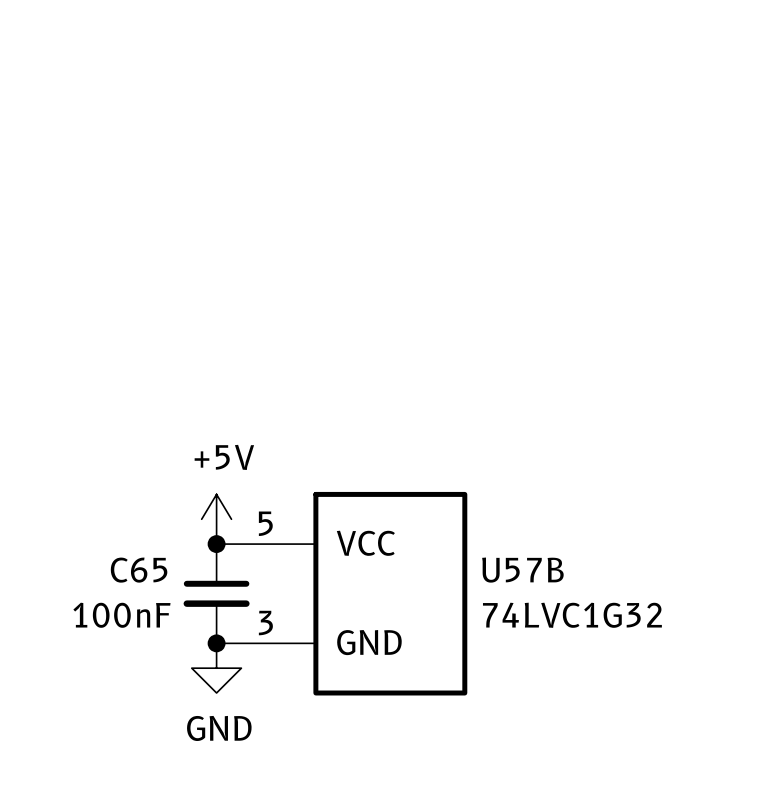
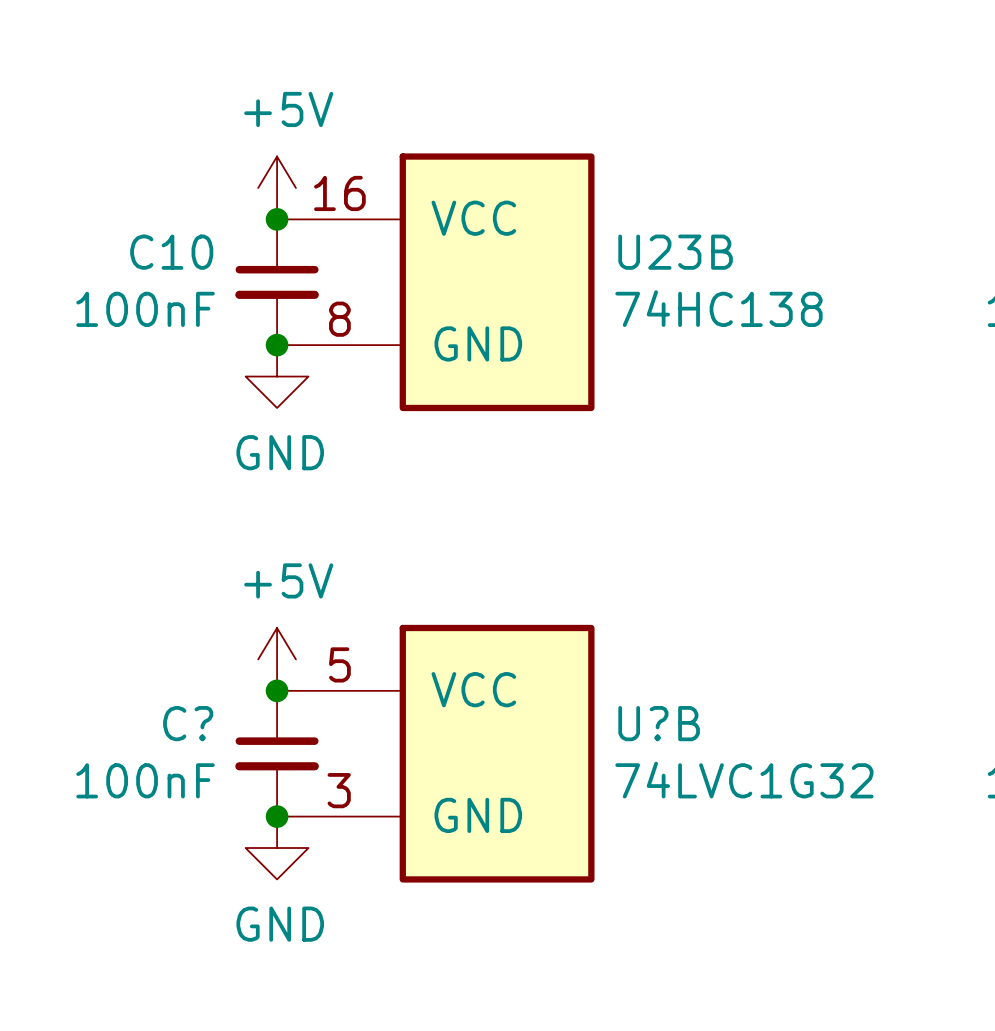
power symbol: none -> +5V (277, 187)
junction: none -> (277, 219)
C10: none -> 100nF (277, 282)
U23B: none -> 74HC138 (435, 282)
junction: none -> (277, 345)
power symbol: none -> GND (277, 376)
C65 name: C65 (139, 570) -> C? (188, 723)
U57B name: U57B (522, 570) -> U?B (659, 723)

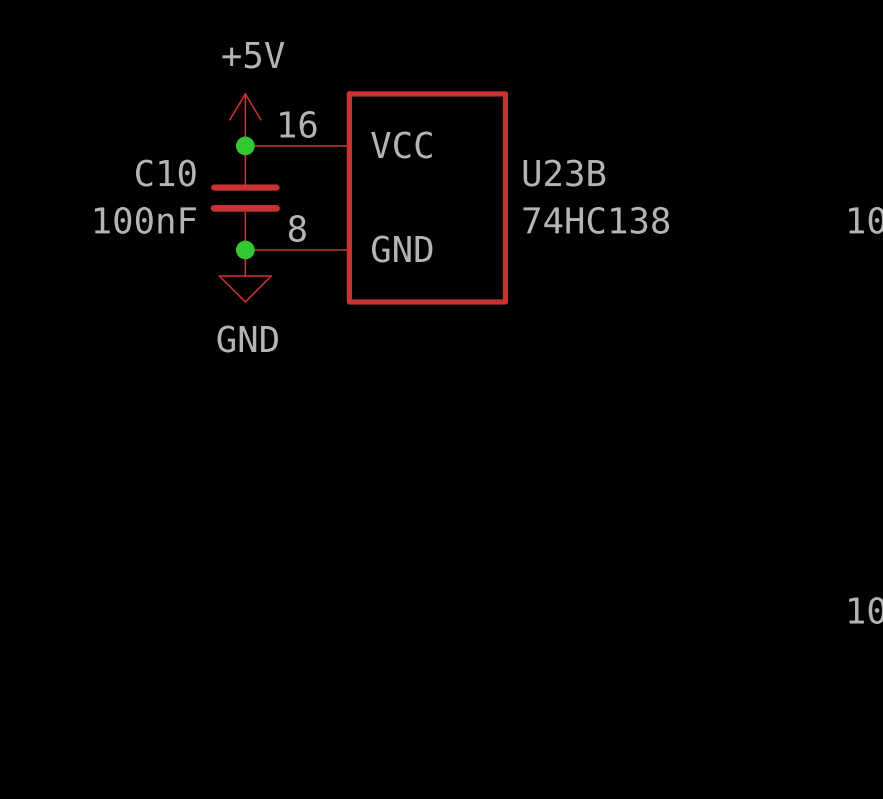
power symbol: +5V (277, 659) -> none
junction: (277, 690) -> none
C?: 100nF (277, 753) -> none
U?B: 74LVC1G32 (435, 753) -> none
junction: (277, 816) -> none
power symbol: GND (277, 848) -> none

